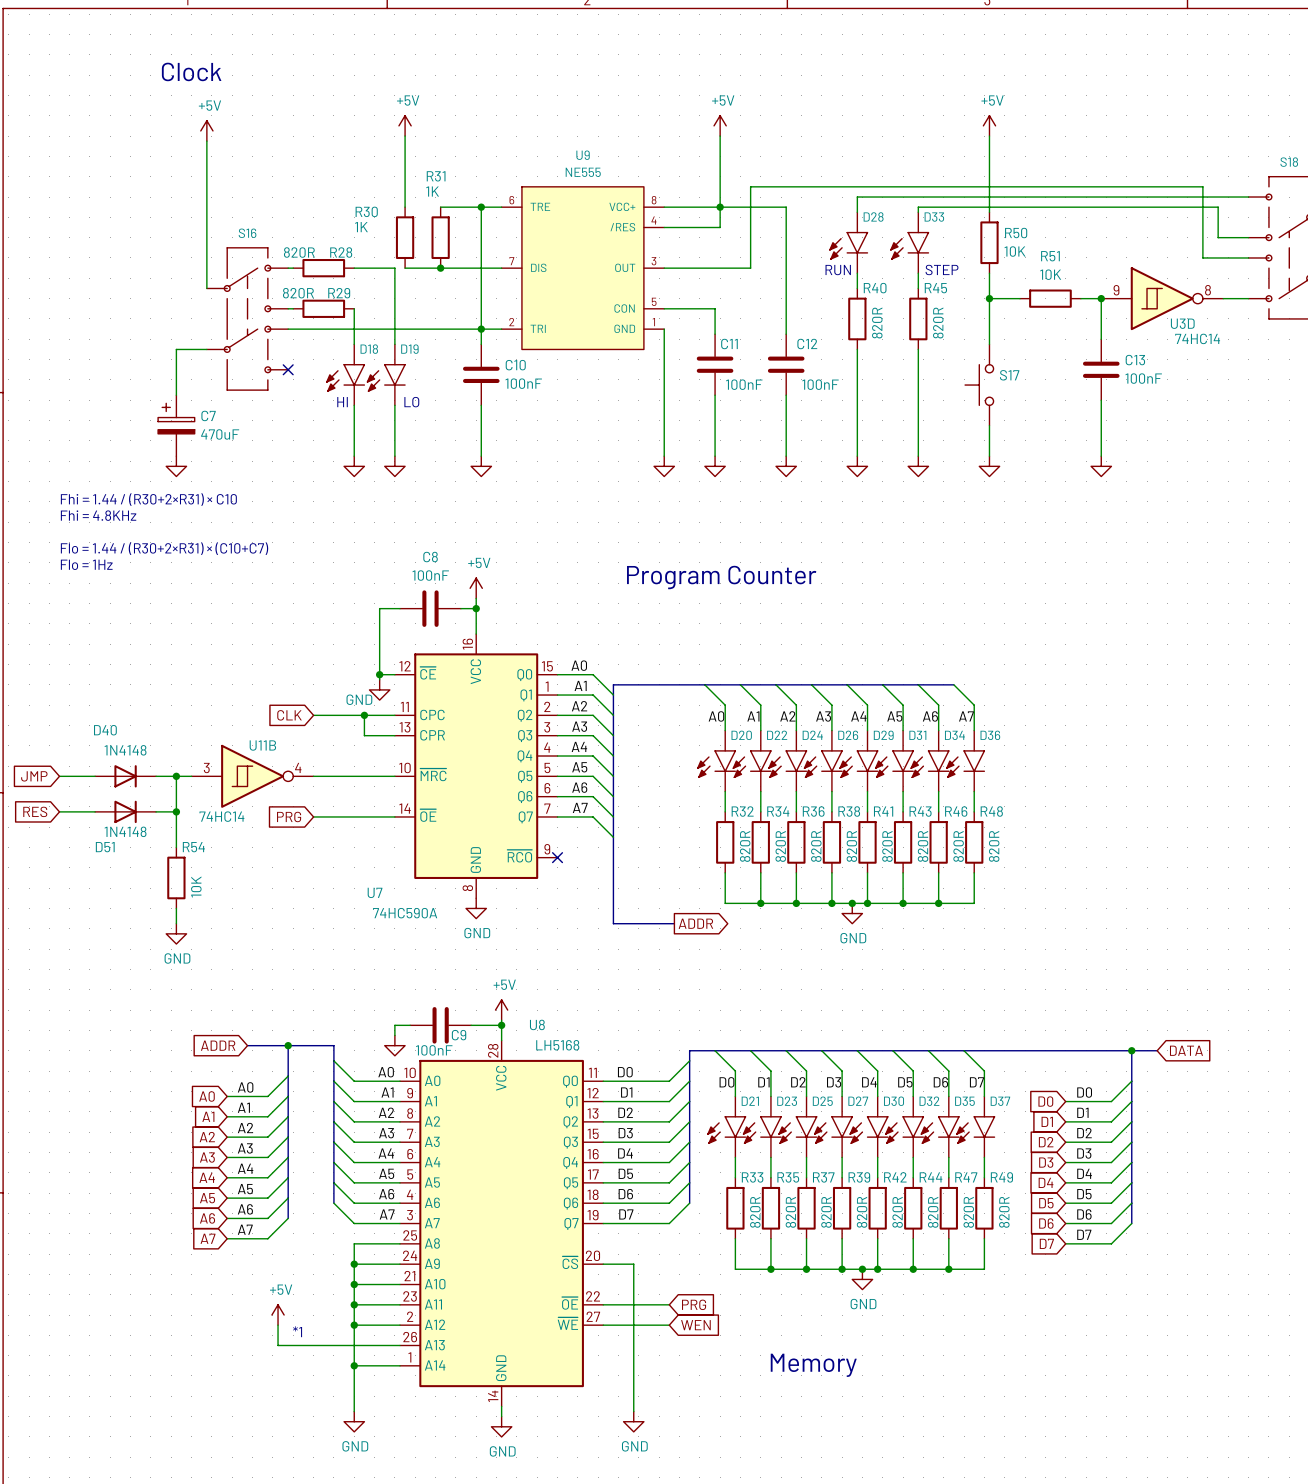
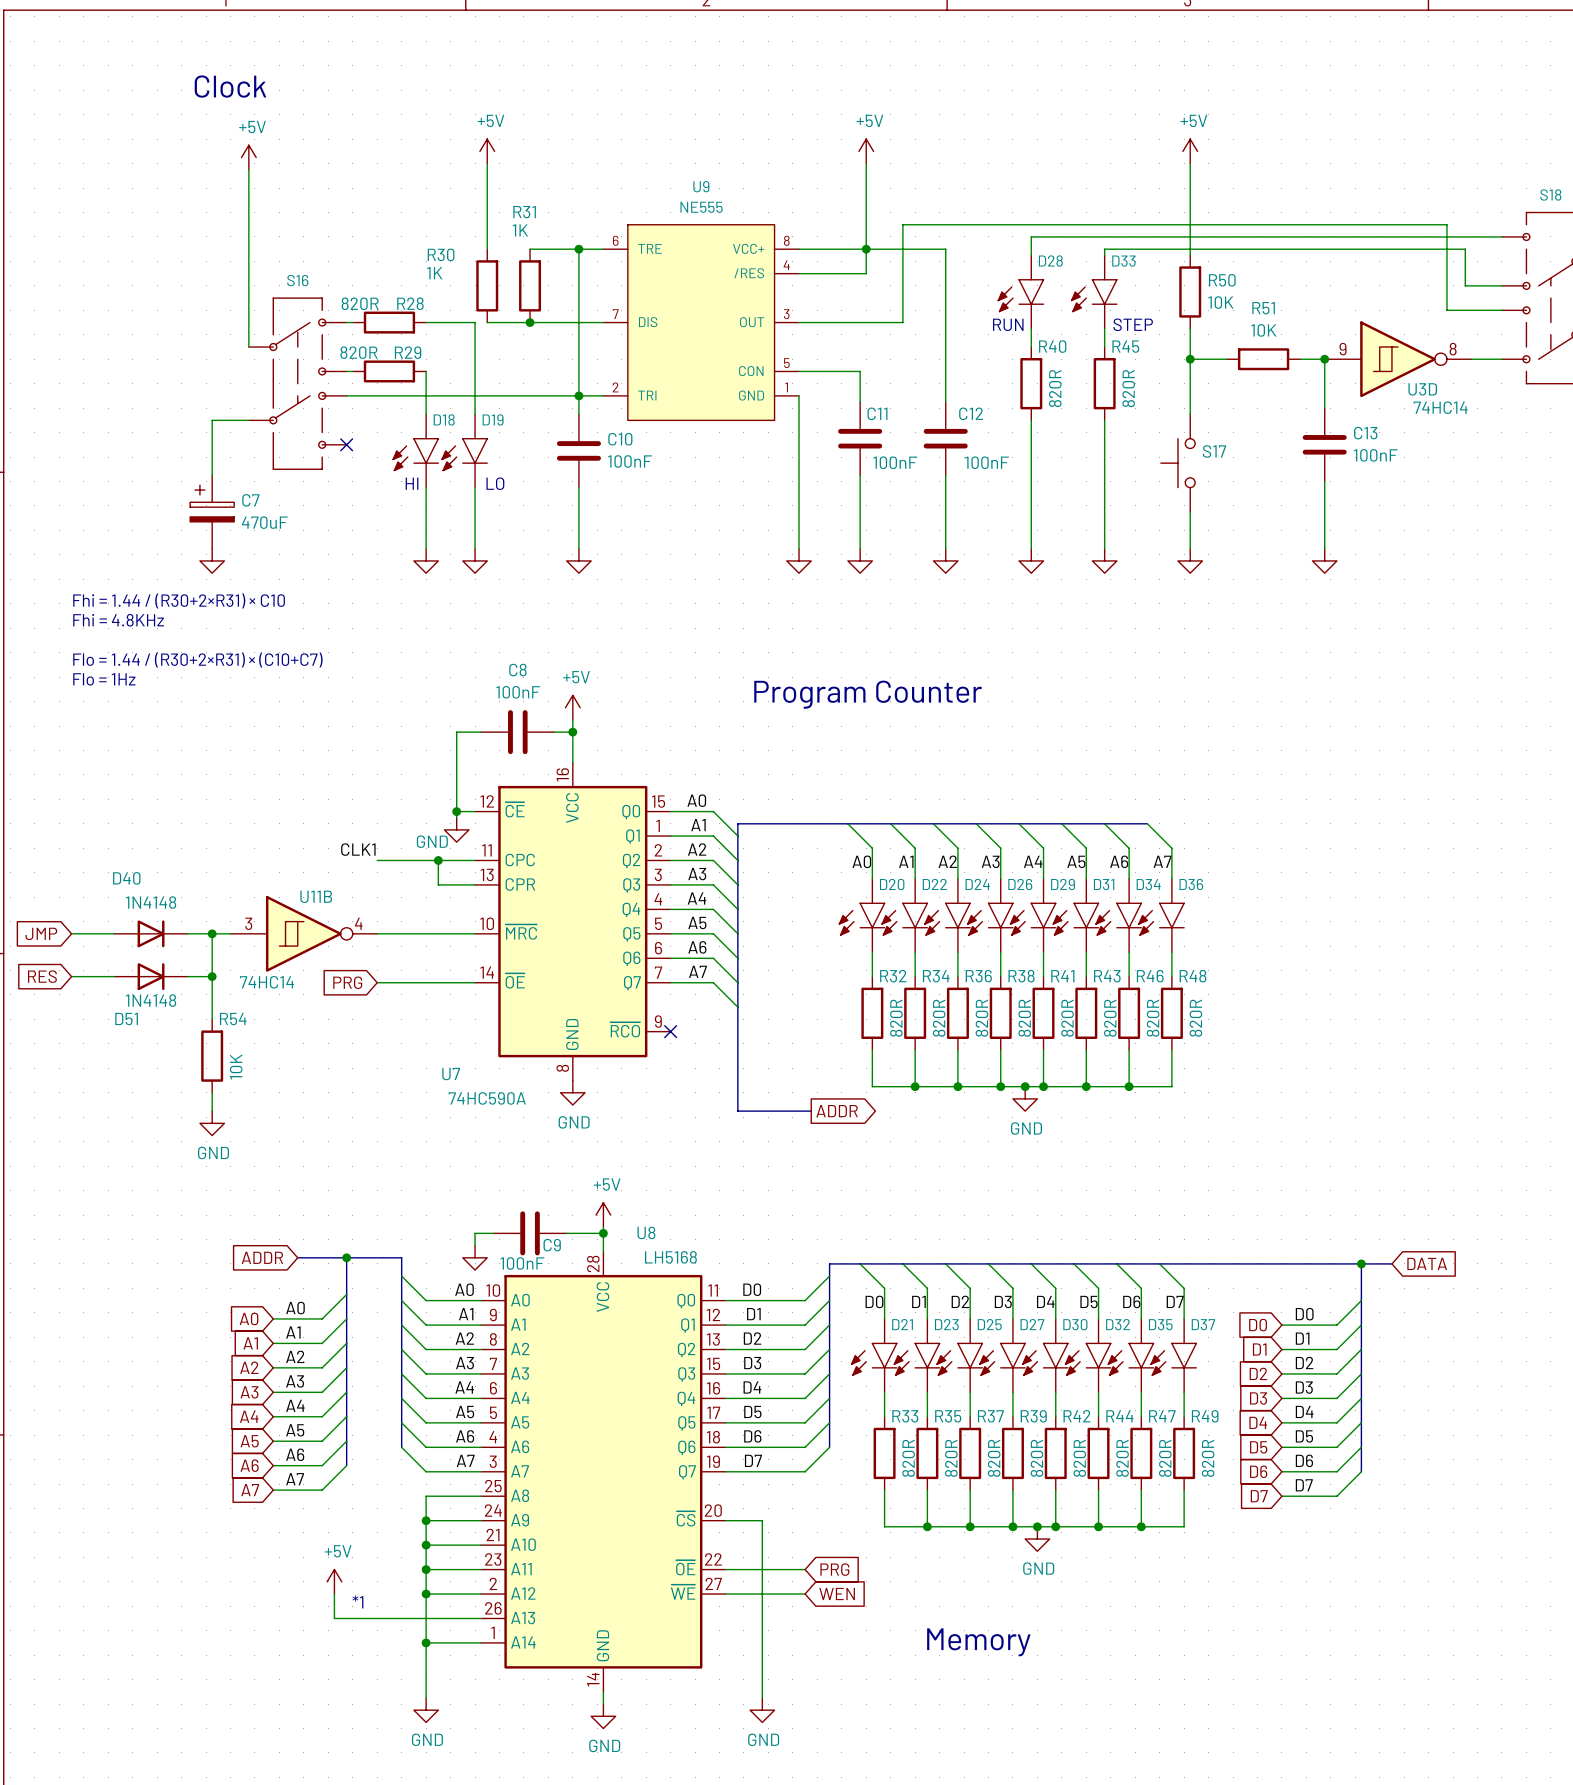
label: none -> CLK1 (358, 849)
global label: CLK (289, 715) -> none

